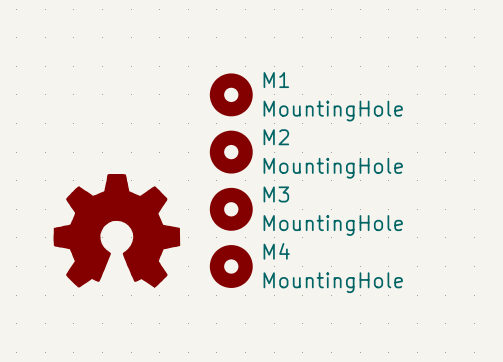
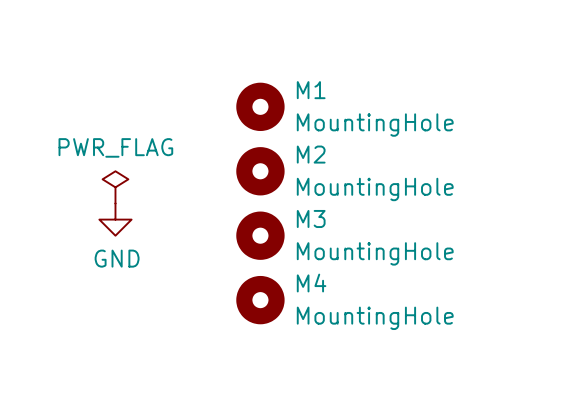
power symbol: none -> PWR_FLAG (115, 187)
power symbol: none -> GND (115, 219)
power symbol: (116, 230) -> none

